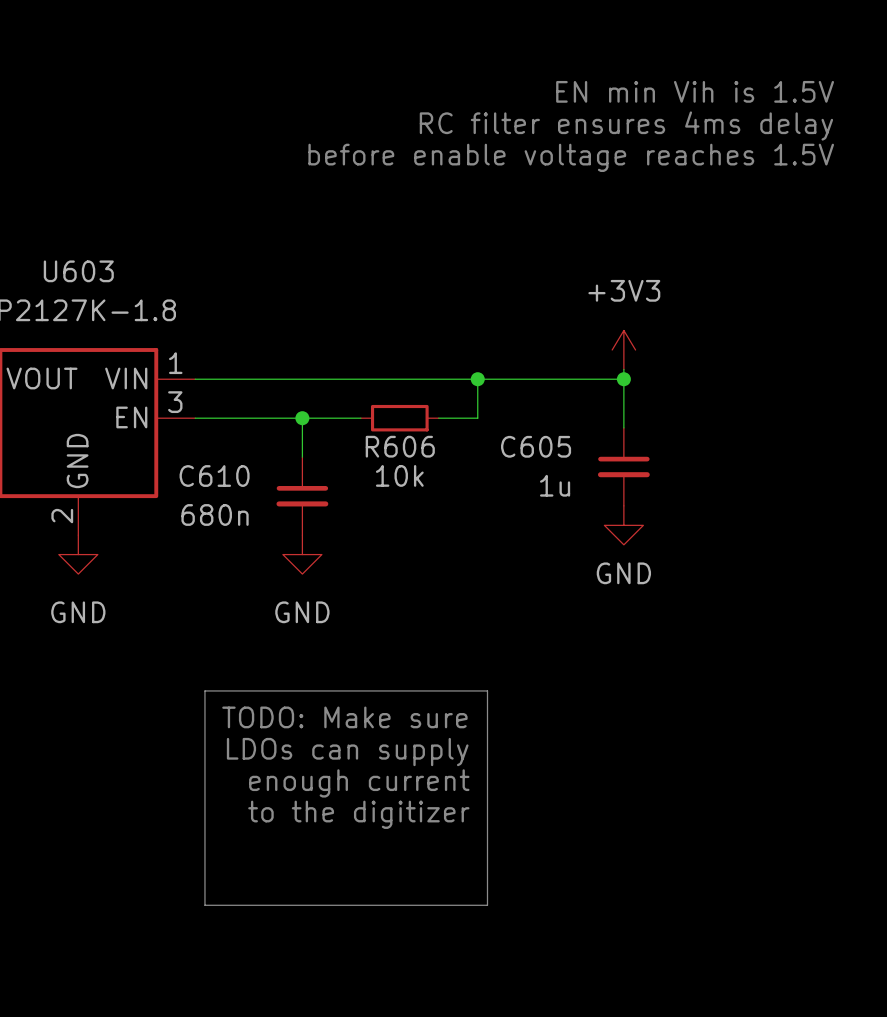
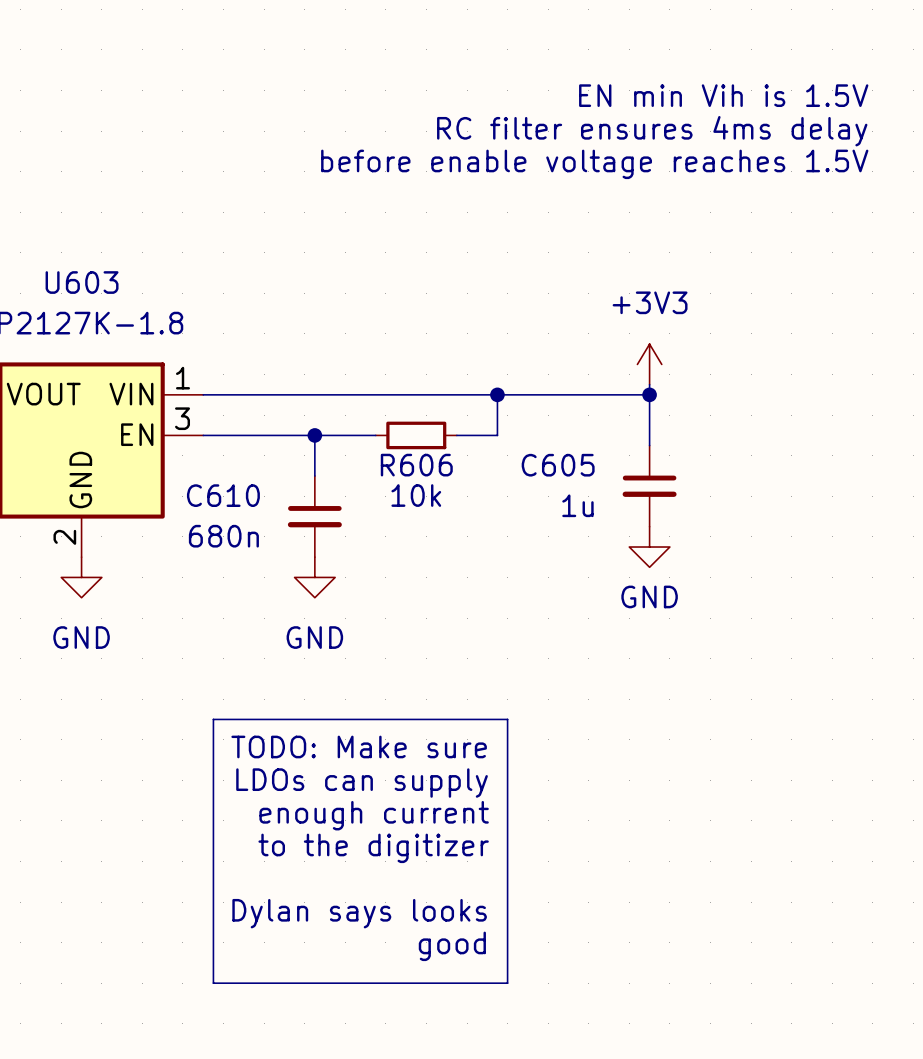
text: none -> Dylan says looks (359, 913)
line: (204, 905) (487, 905) -> (213, 942) (213, 983) (507, 983) (507, 942)
text: none -> good (452, 946)

